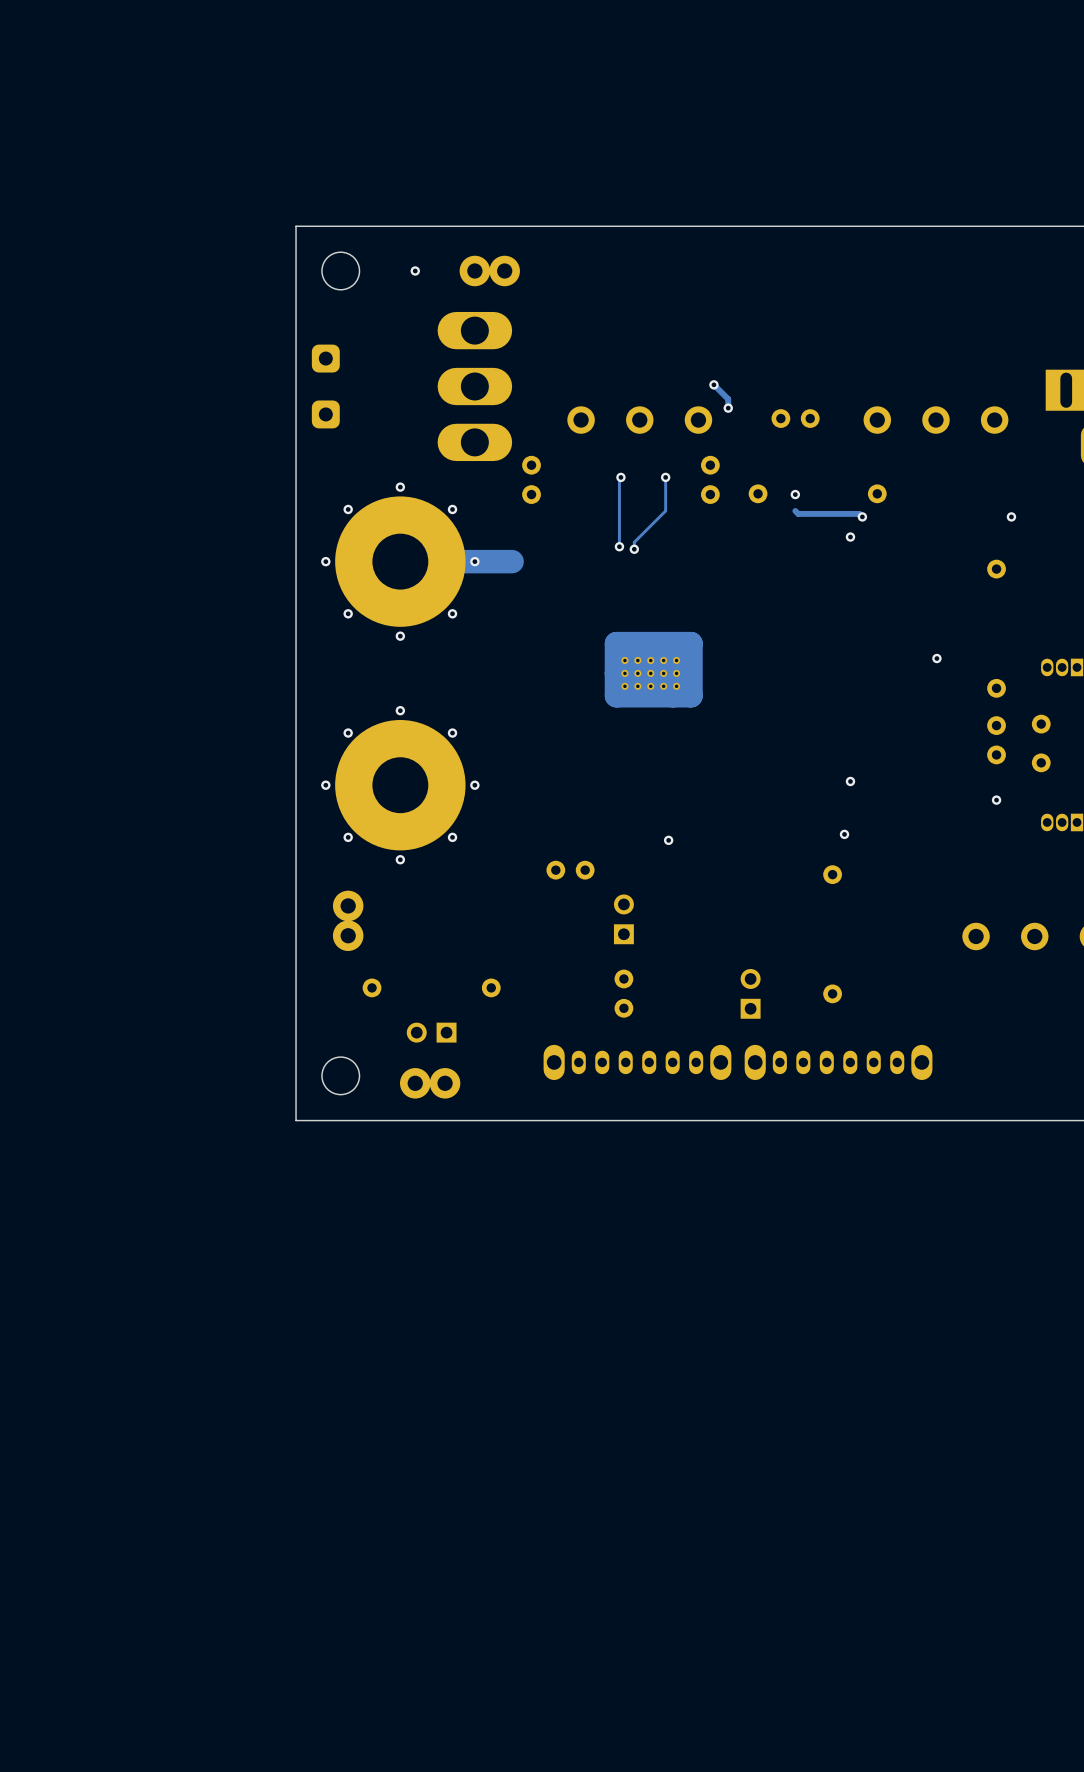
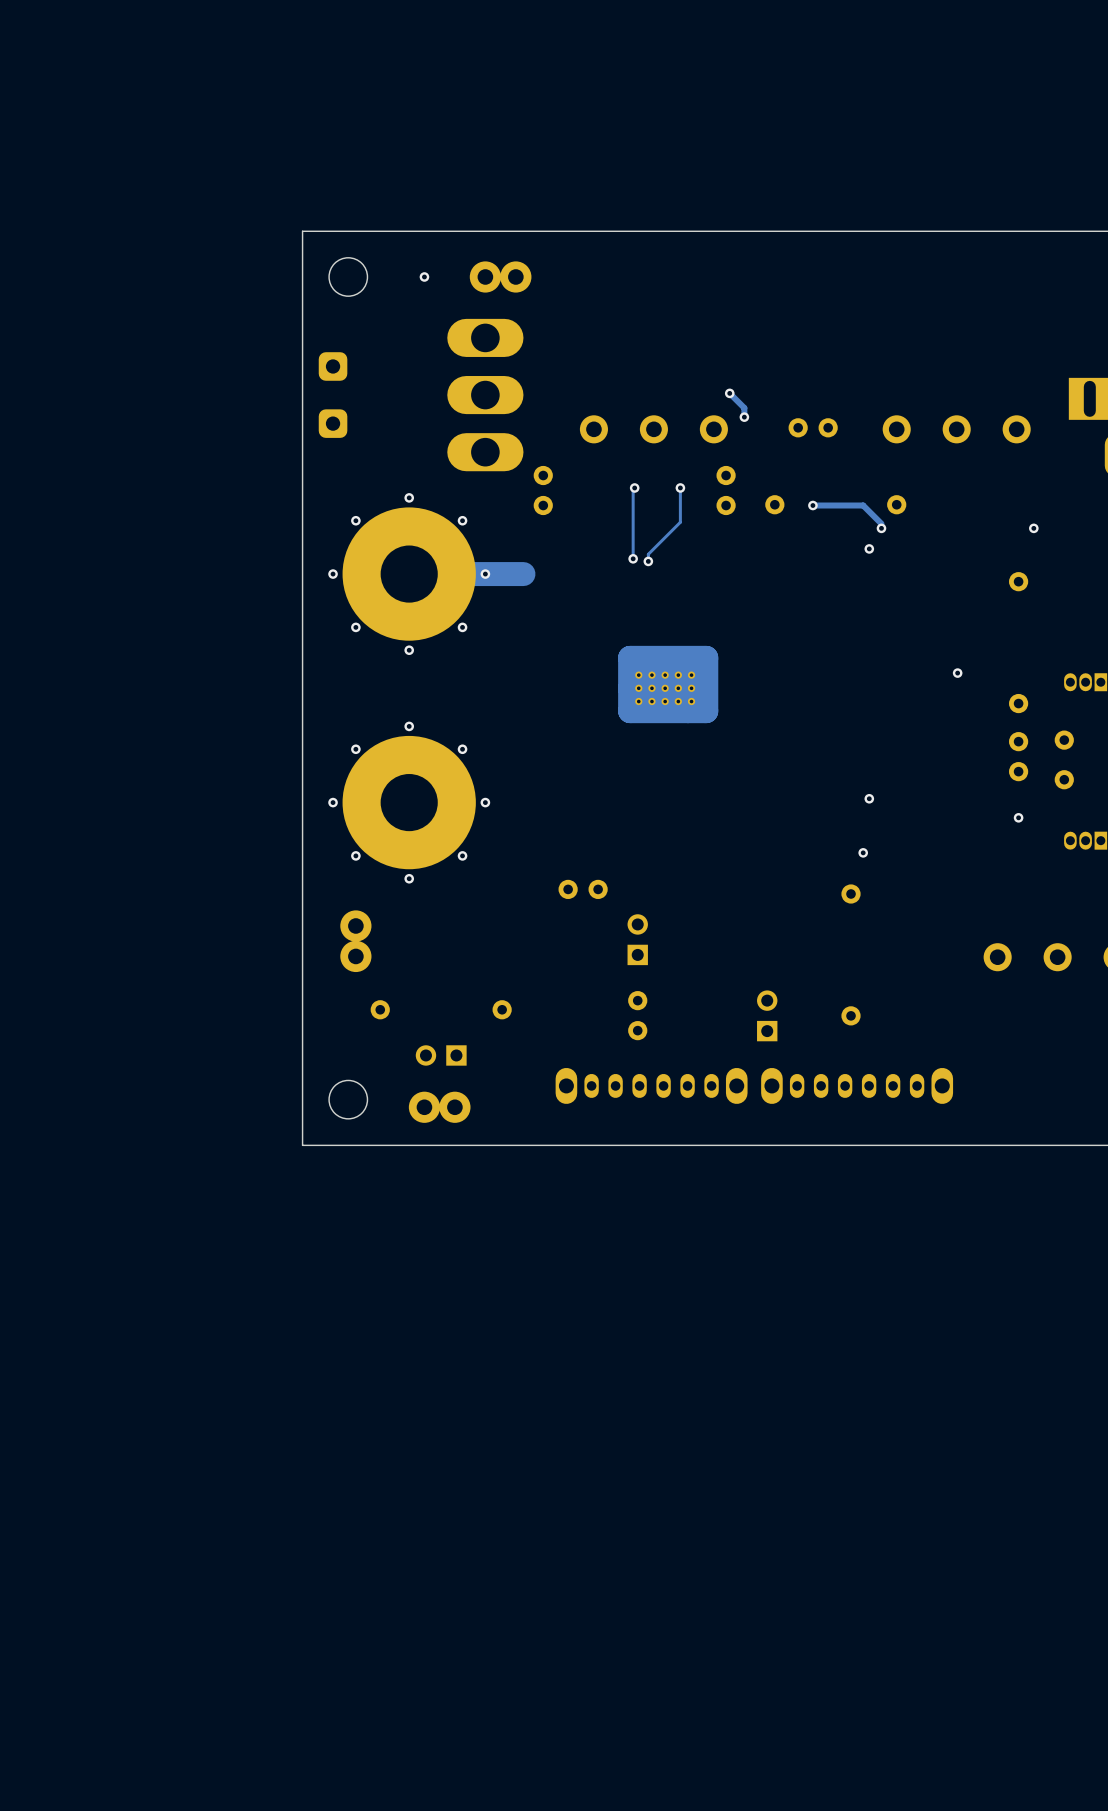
track: none -> (812, 505) (863, 505) (881, 523)
track: (795, 510) (798, 513) (859, 513) (862, 516) -> none
via: (668, 840) -> none

